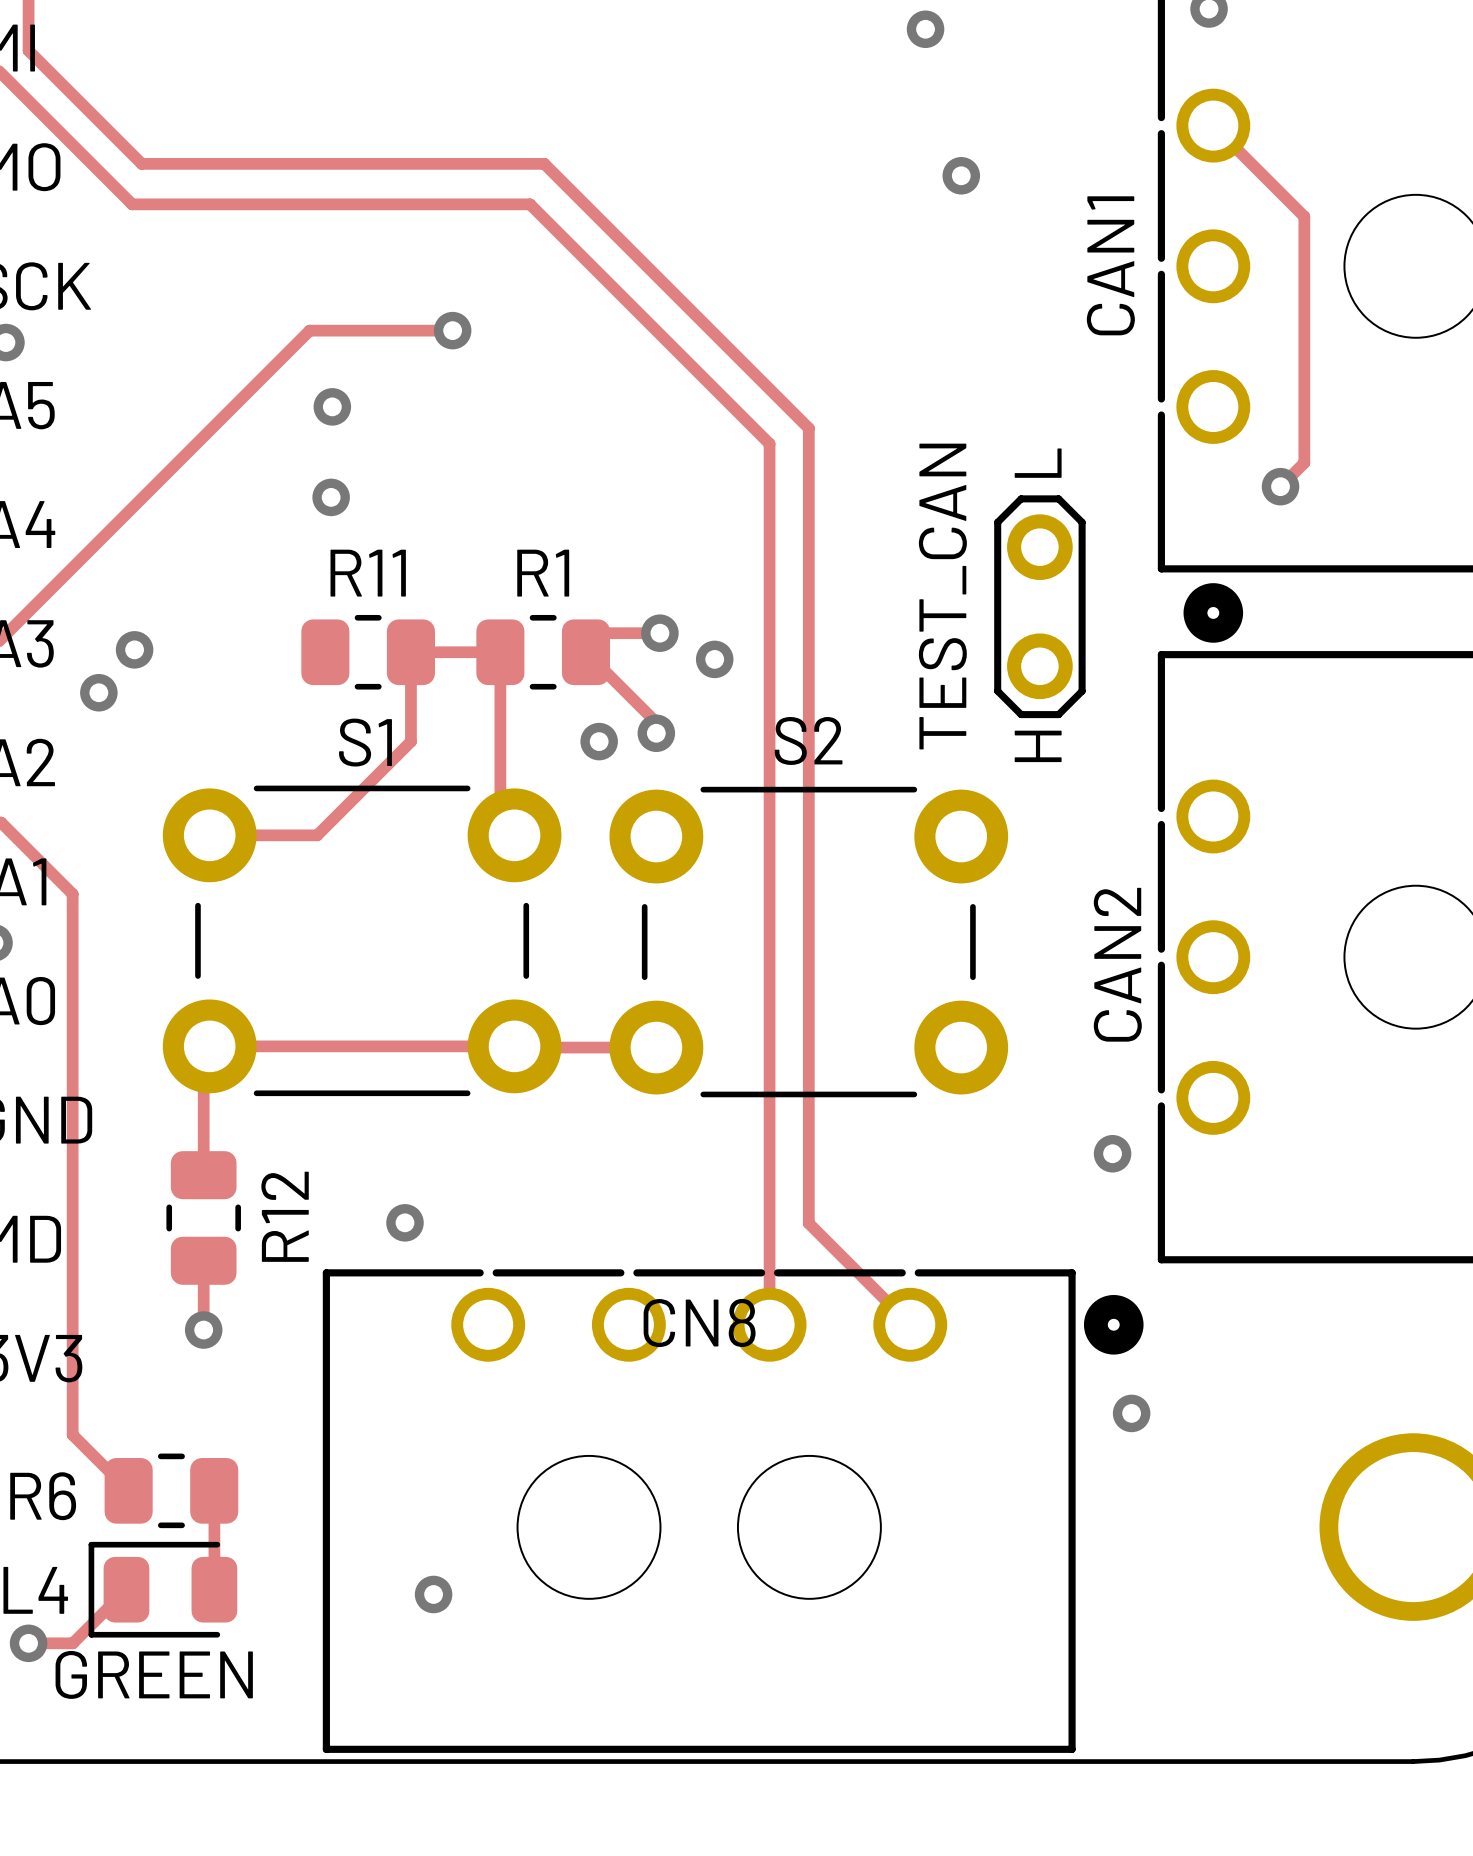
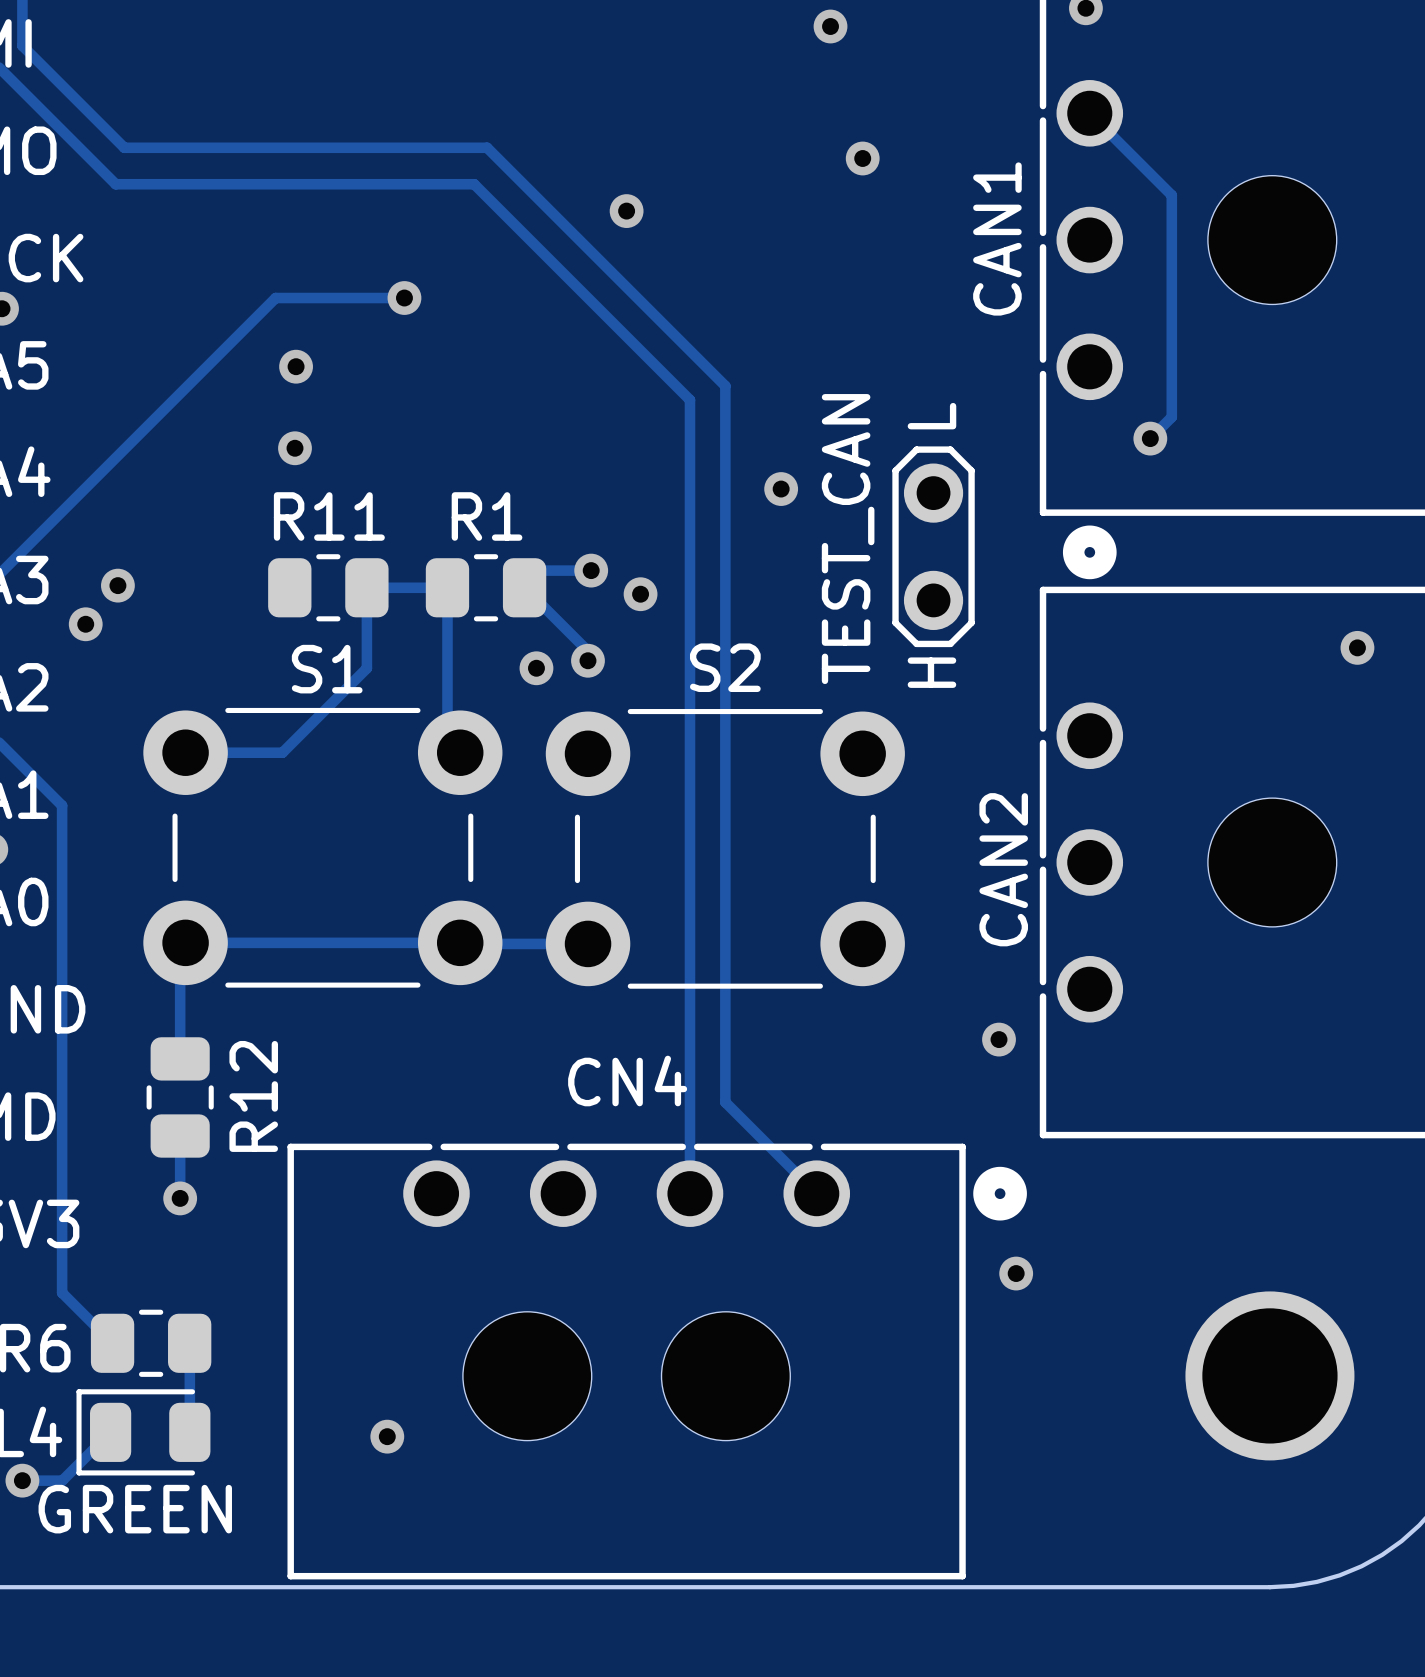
via: none -> (626, 211)
via: none -> (781, 489)
via: (405, 1222) -> none
CN8 name: CN8 (699, 1322) -> CN4 (627, 1081)

